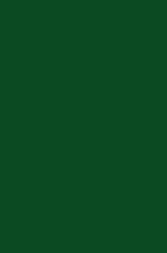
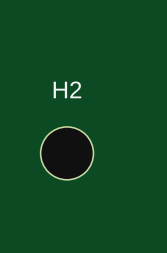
H2: none -> (67, 153)

